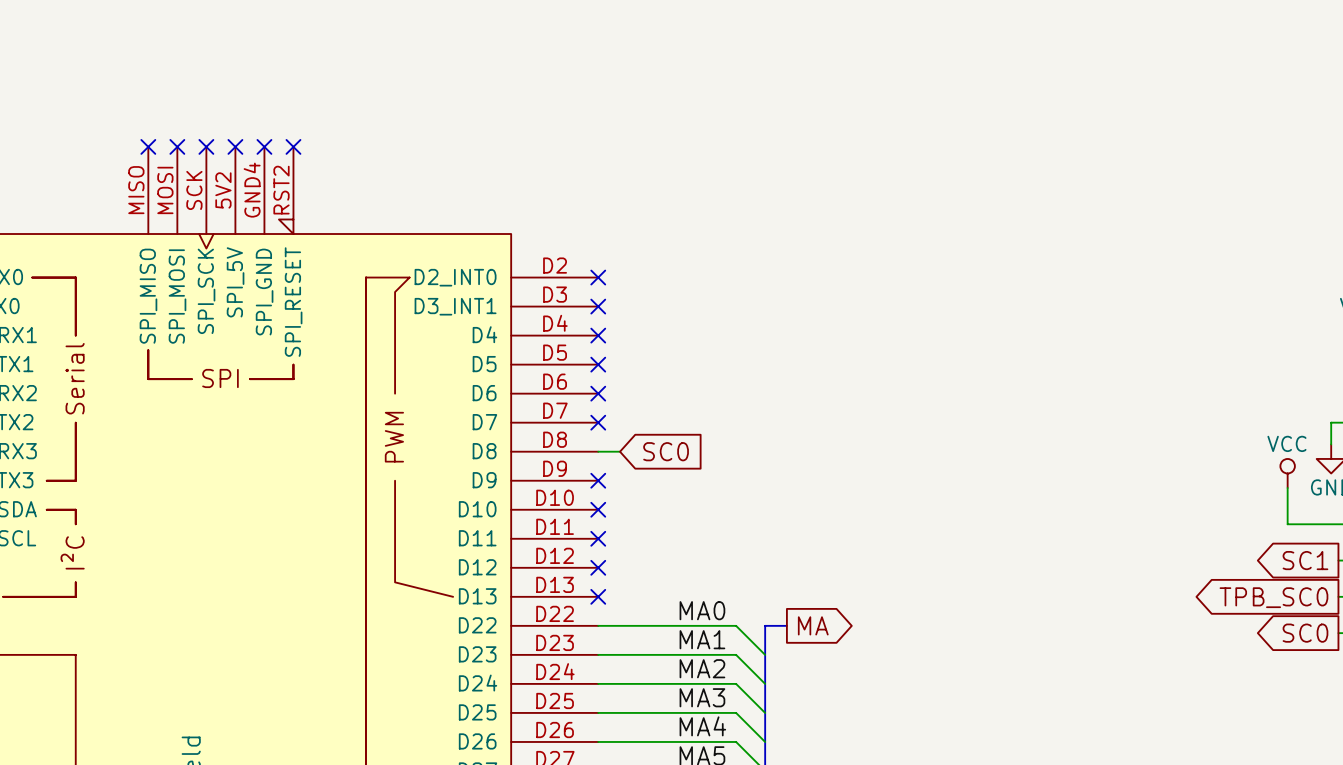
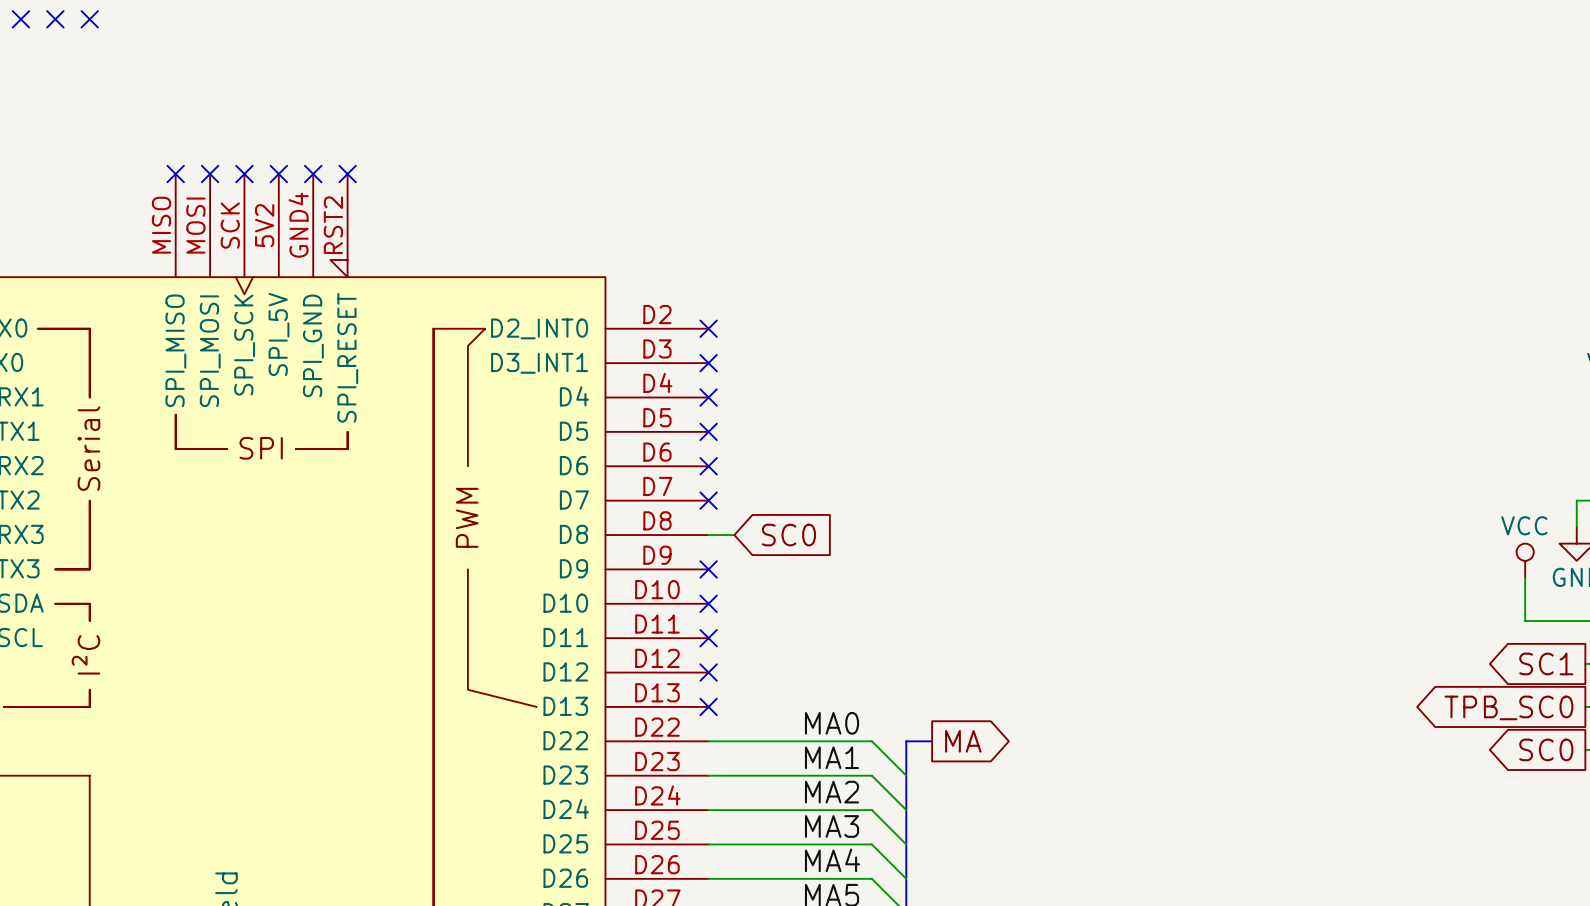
no-connect mark: none -> (20, 19)
no-connect mark: none -> (55, 19)
no-connect mark: none -> (89, 19)

